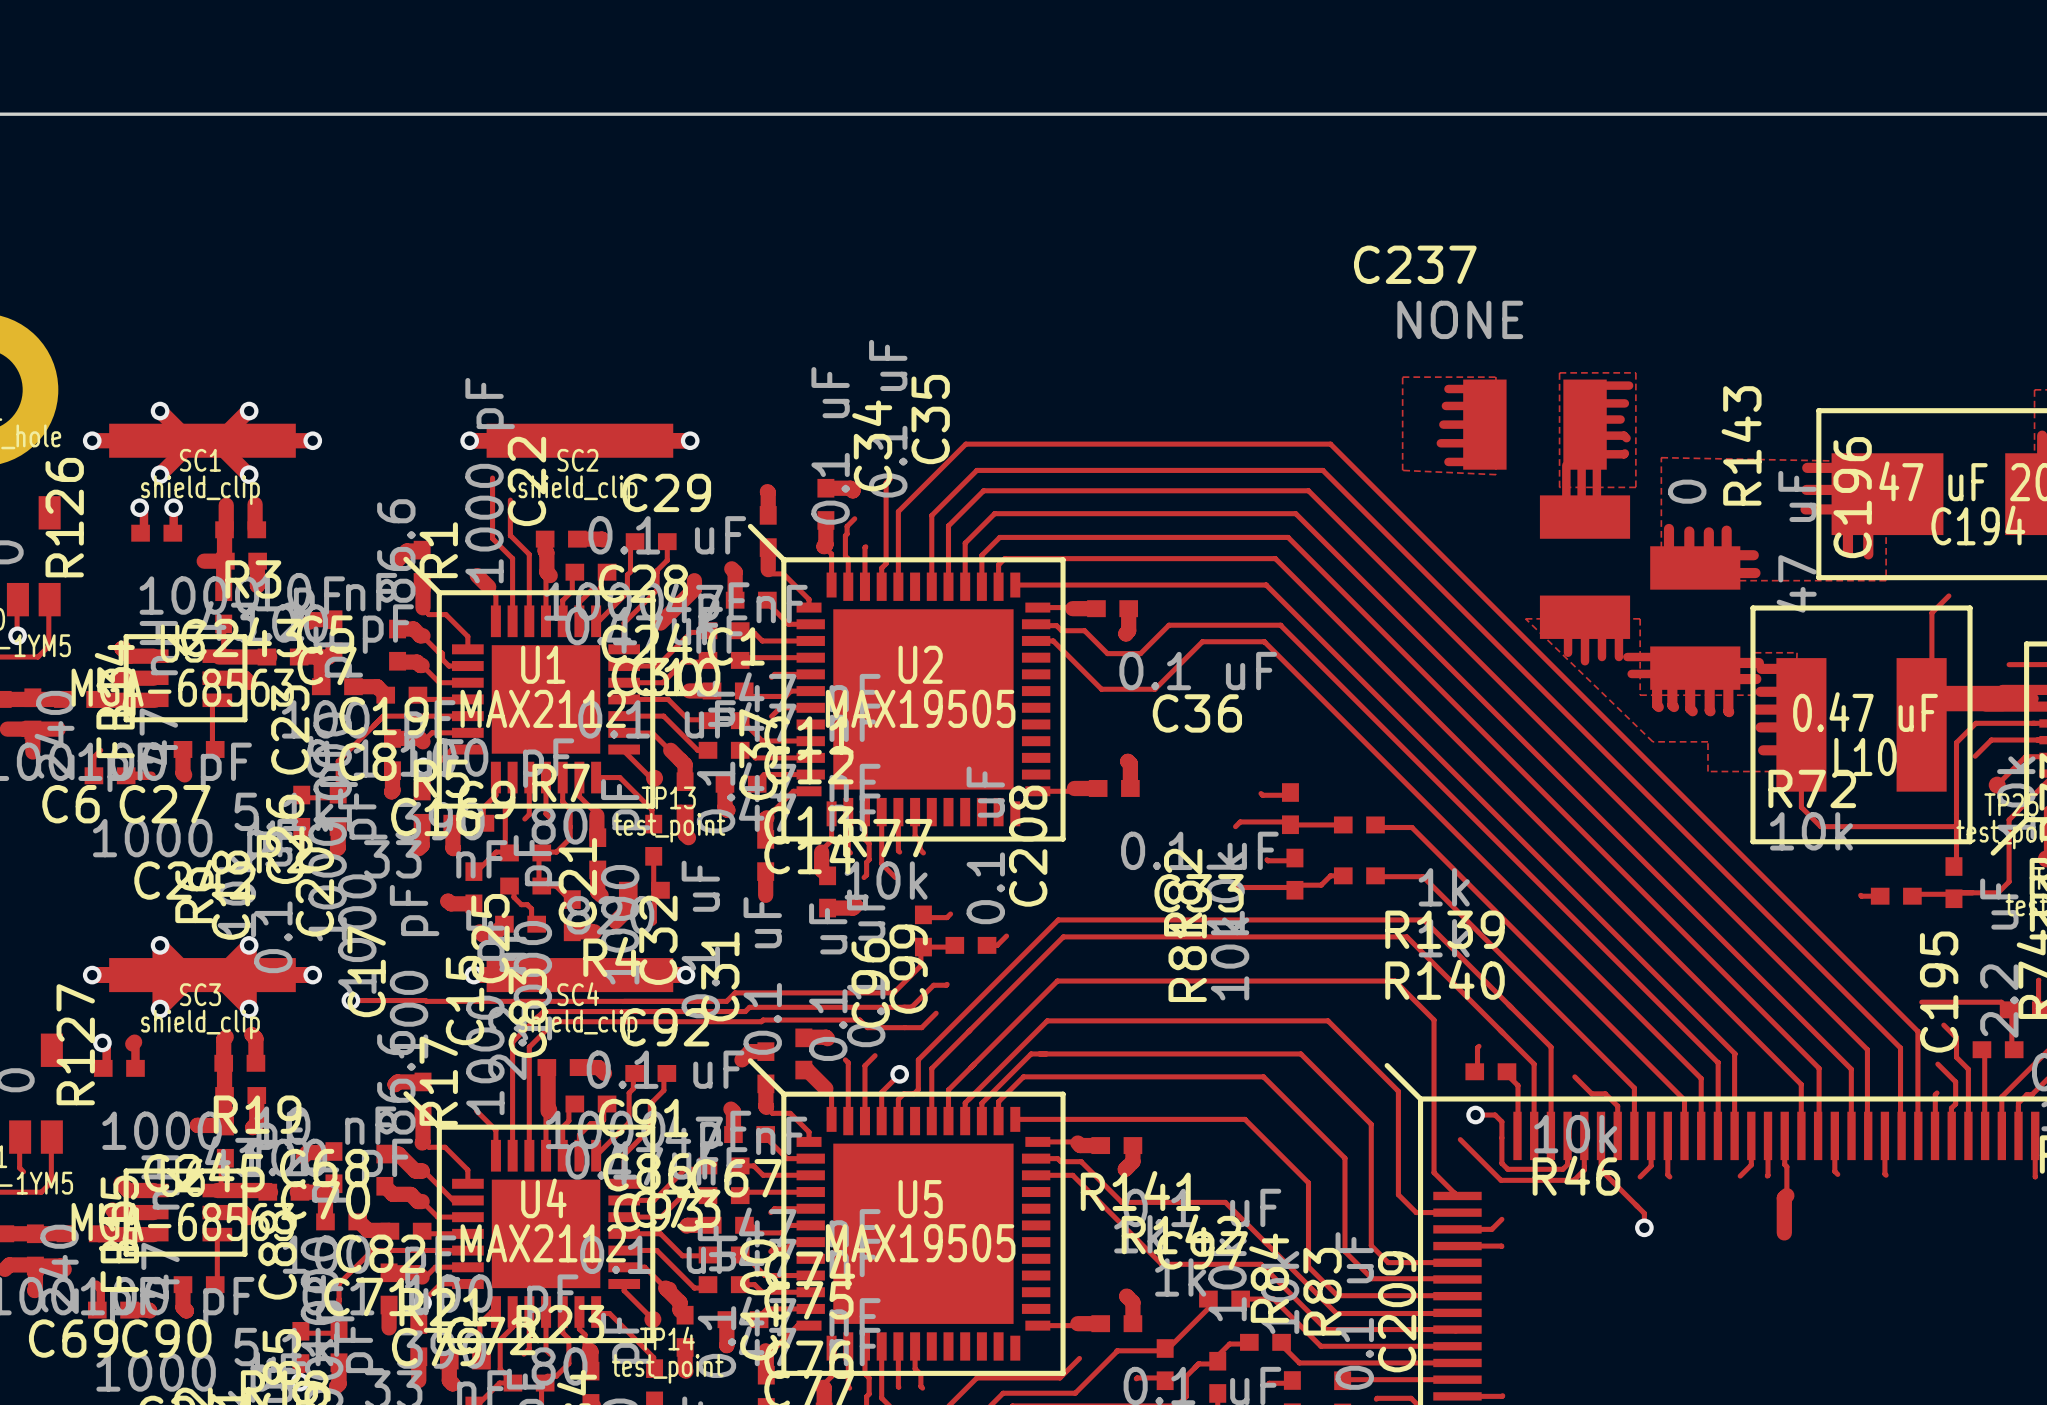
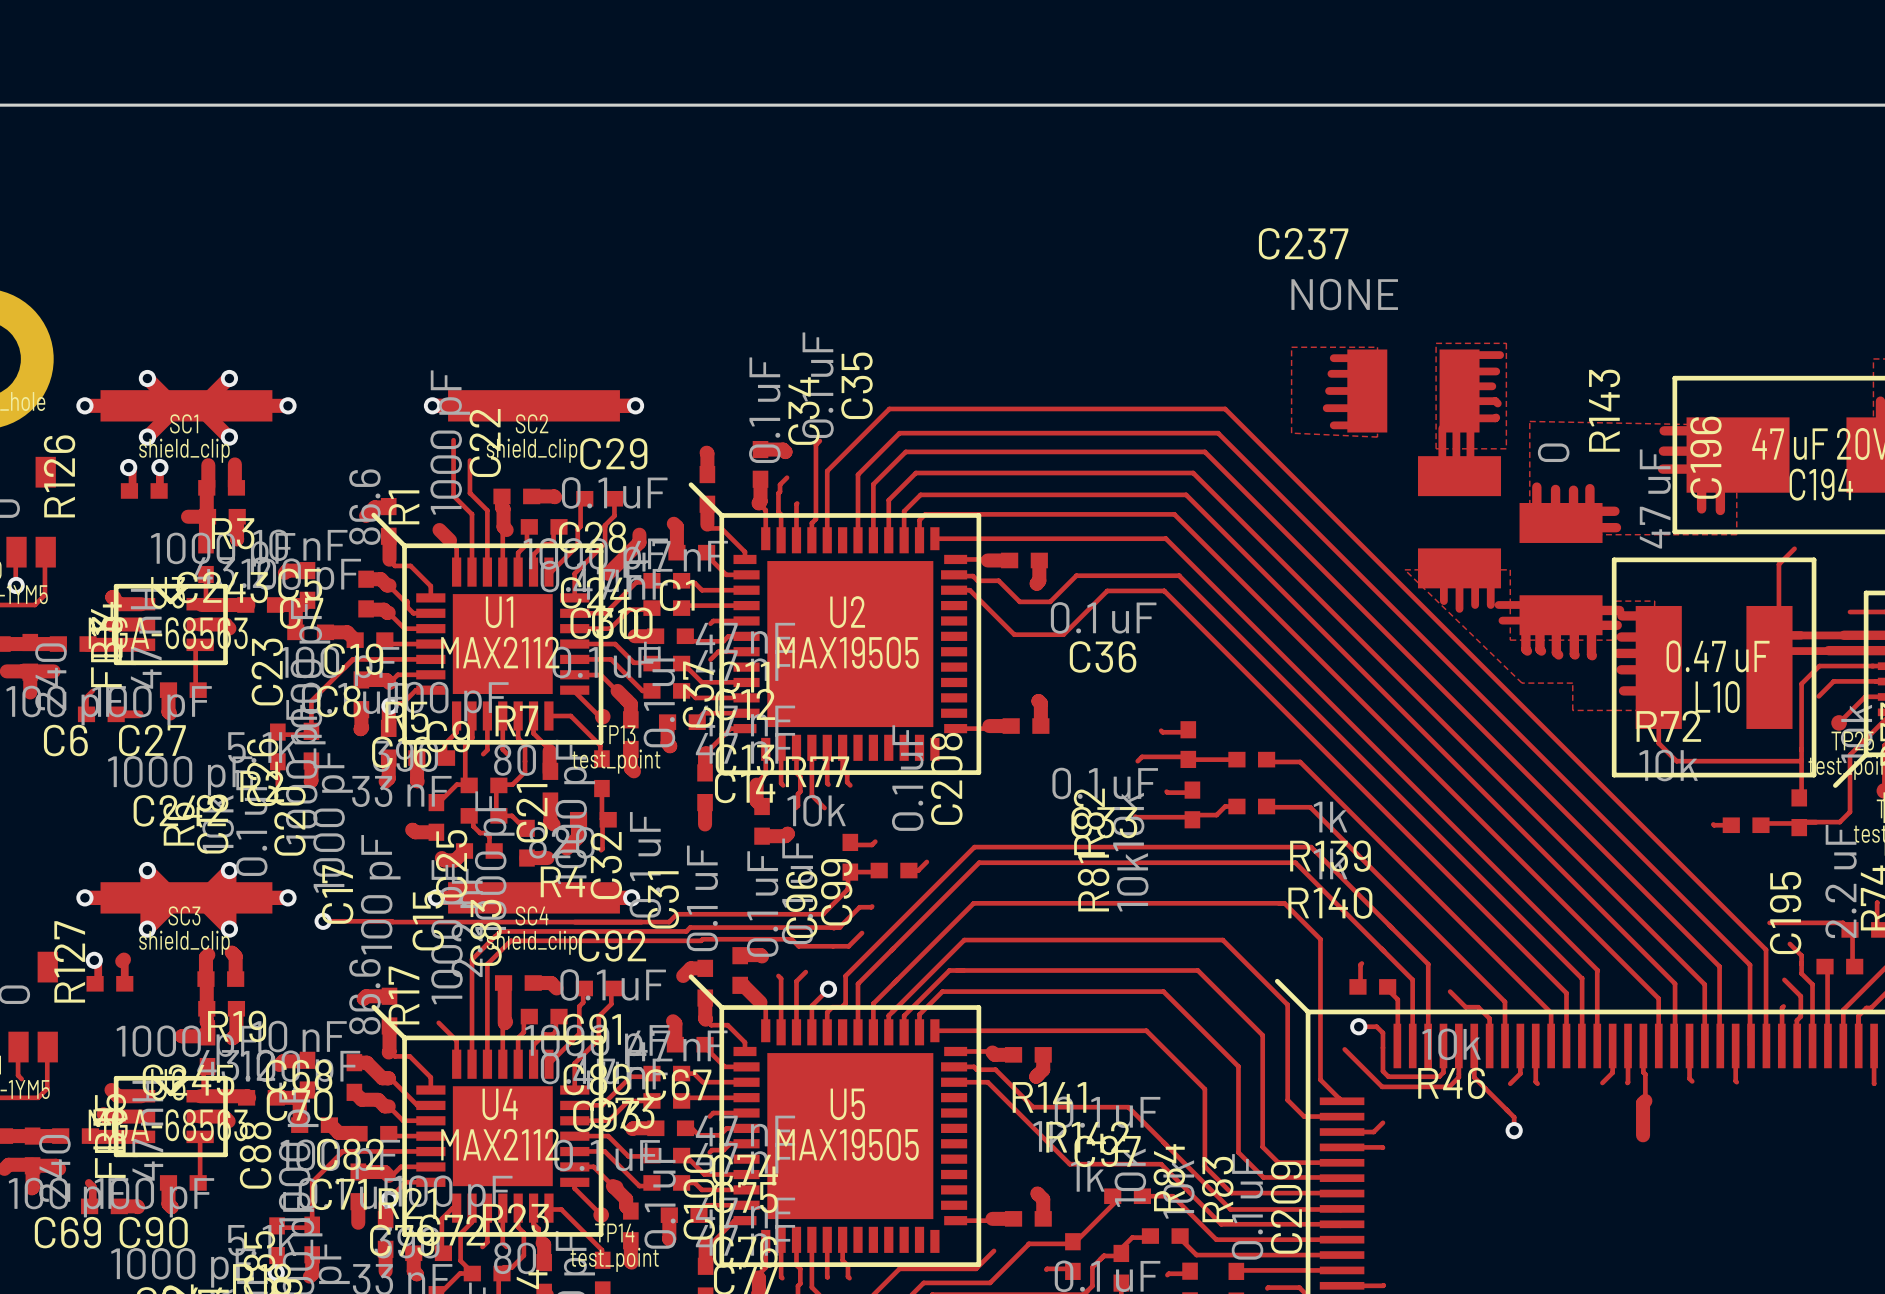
track: (1934, 696) (1936, 698) (1998, 698) -> none
track: (1993, 698) (2033, 698) -> none

